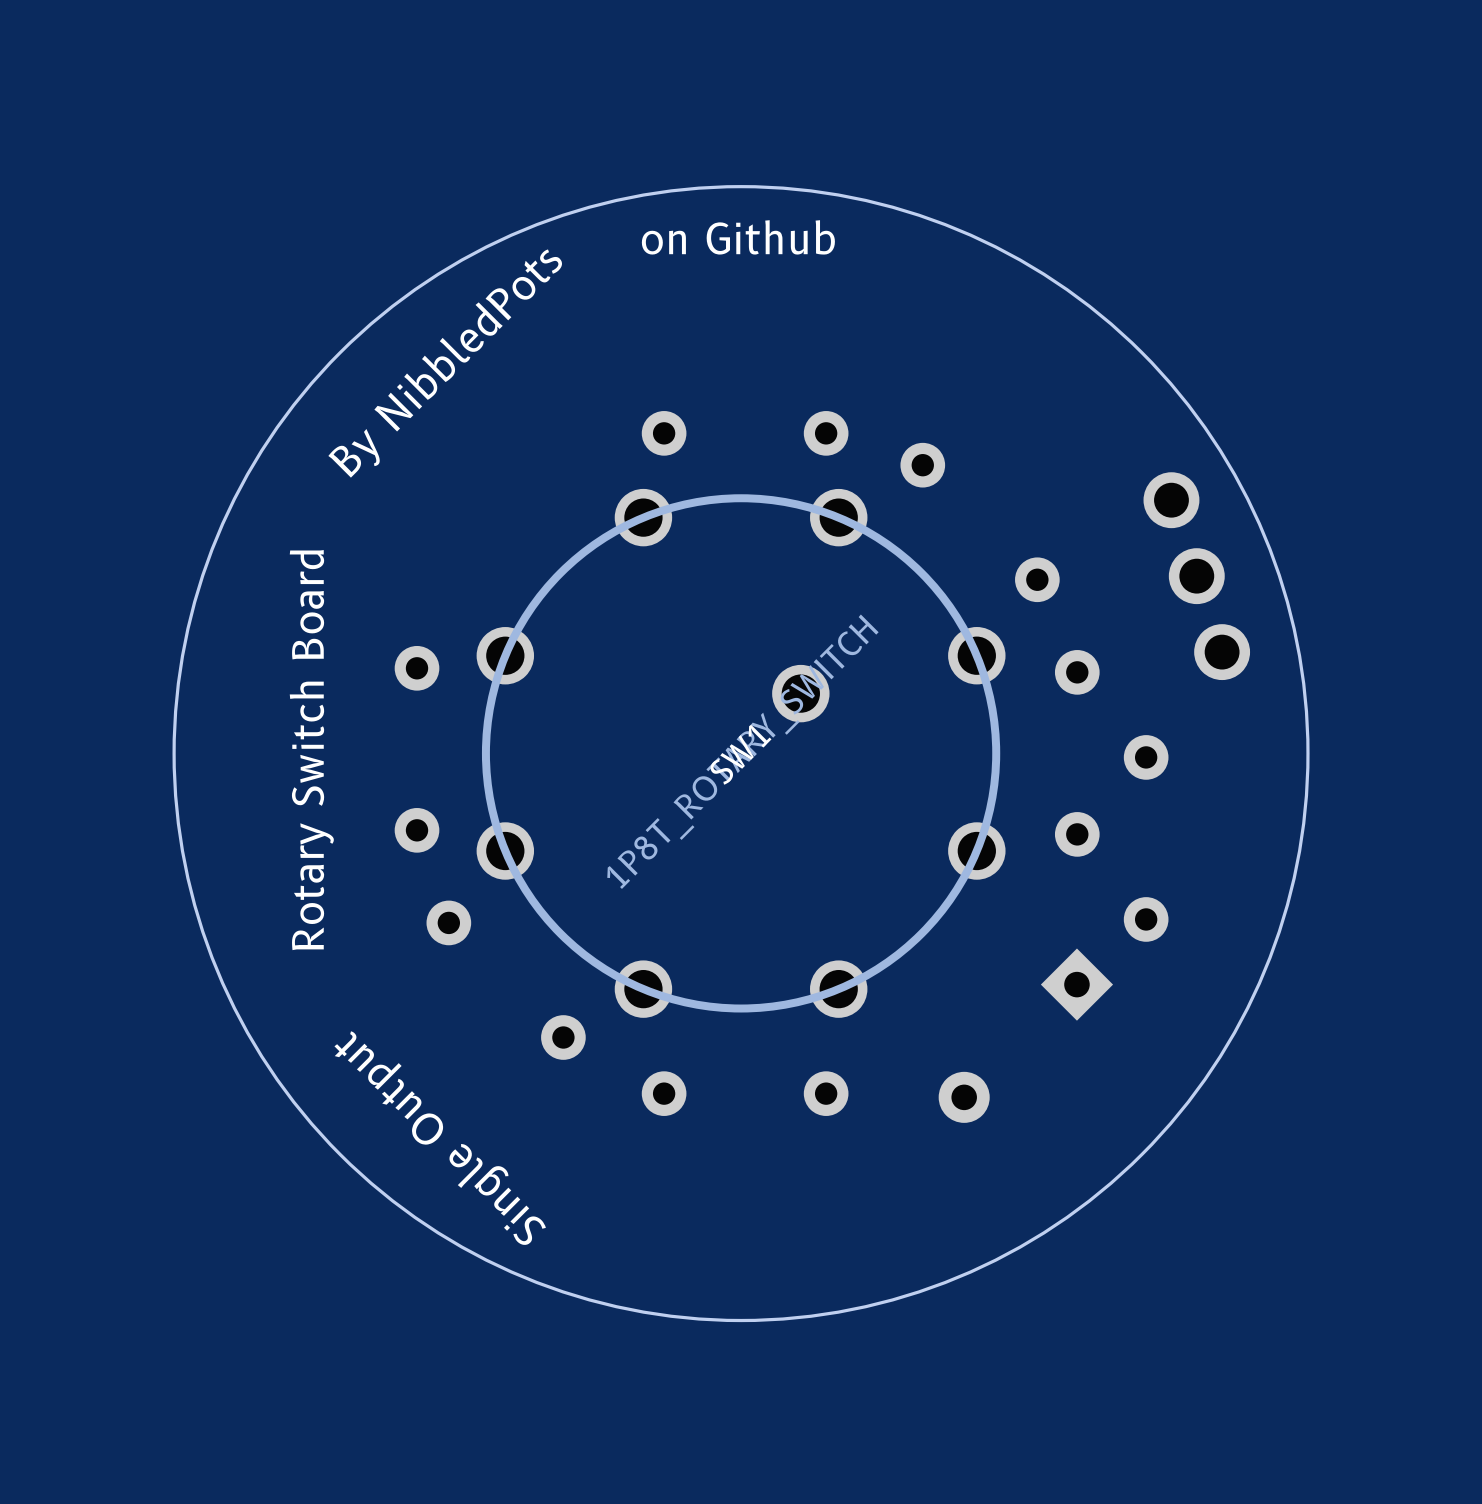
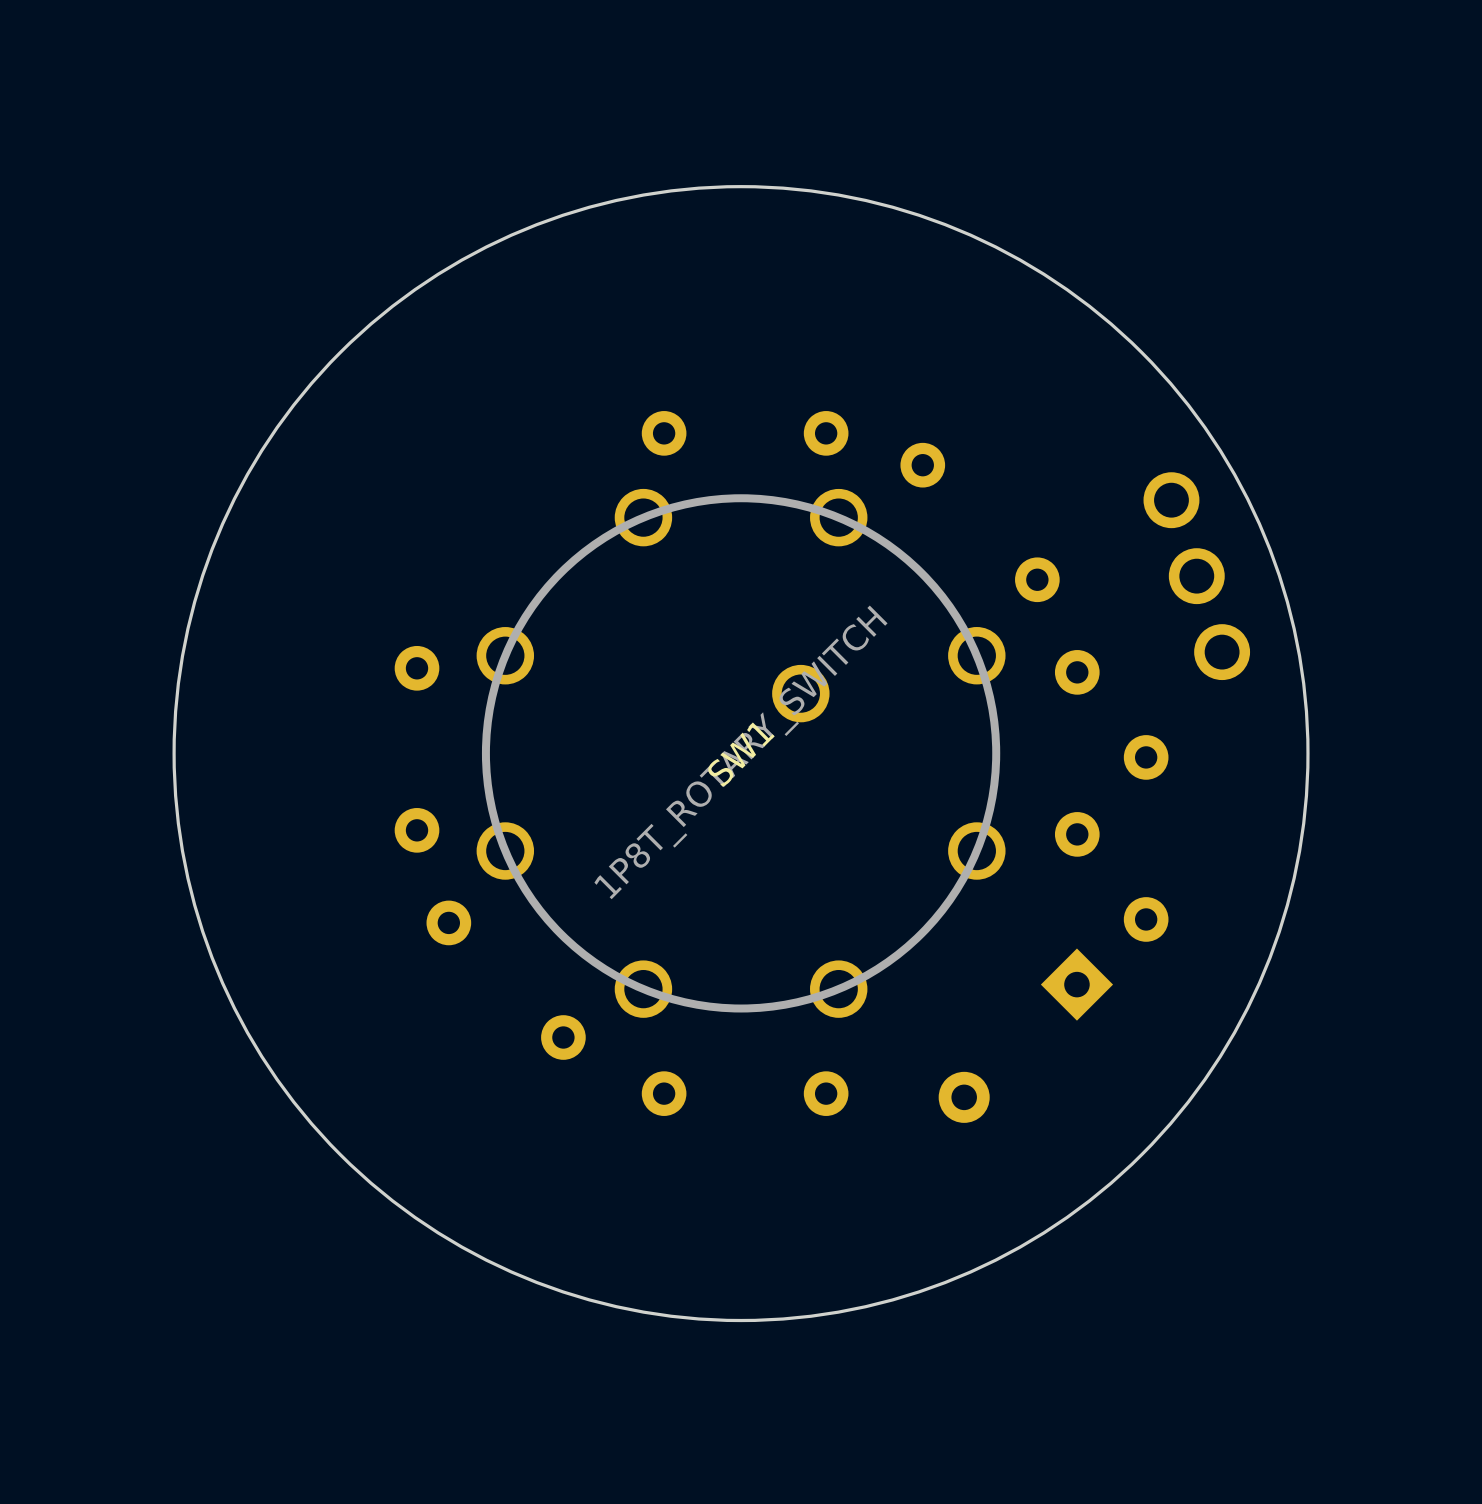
text: on Github (738, 237) -> none
text: By NibbledPots (445, 363) -> none
text: Rotary Switch Board (311, 750) -> none
text: Single Output (440, 1138) -> none

